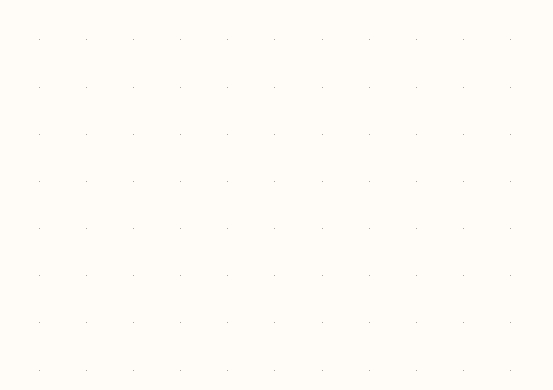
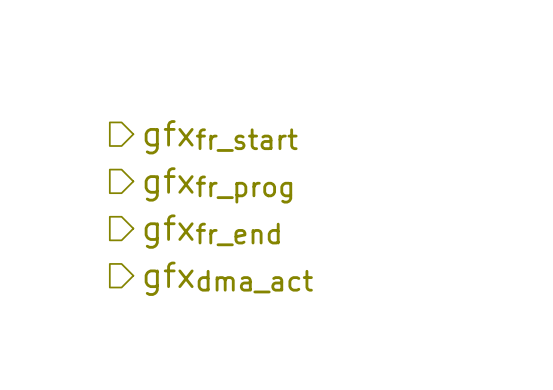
hierarchical label: none -> gfxfr_start (221, 137)
hierarchical label: none -> gfxfr_prog (218, 185)
hierarchical label: none -> gfxfr_end (212, 231)
hierarchical label: none -> gfxdma_act (228, 278)

